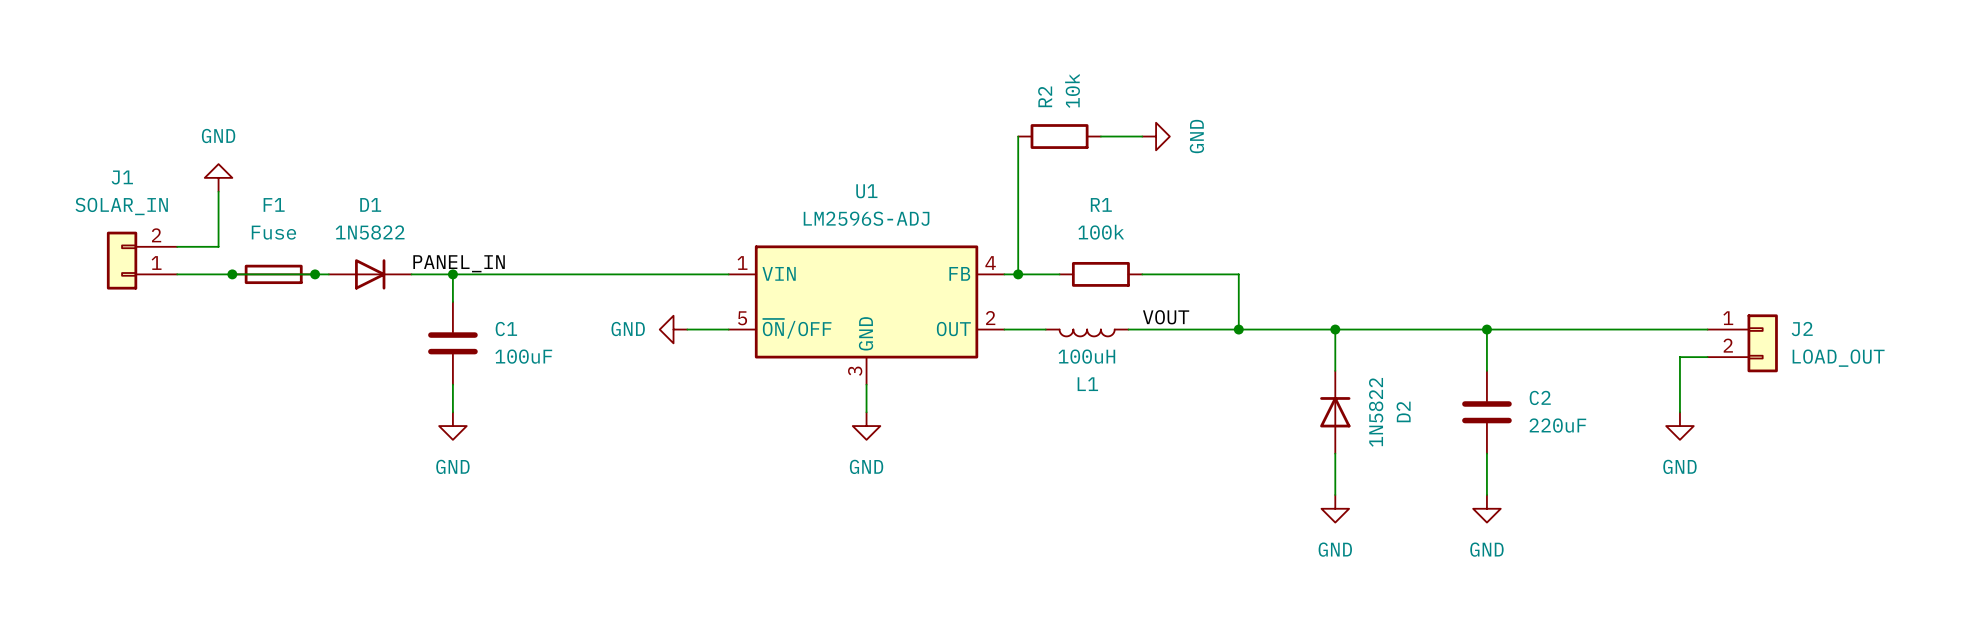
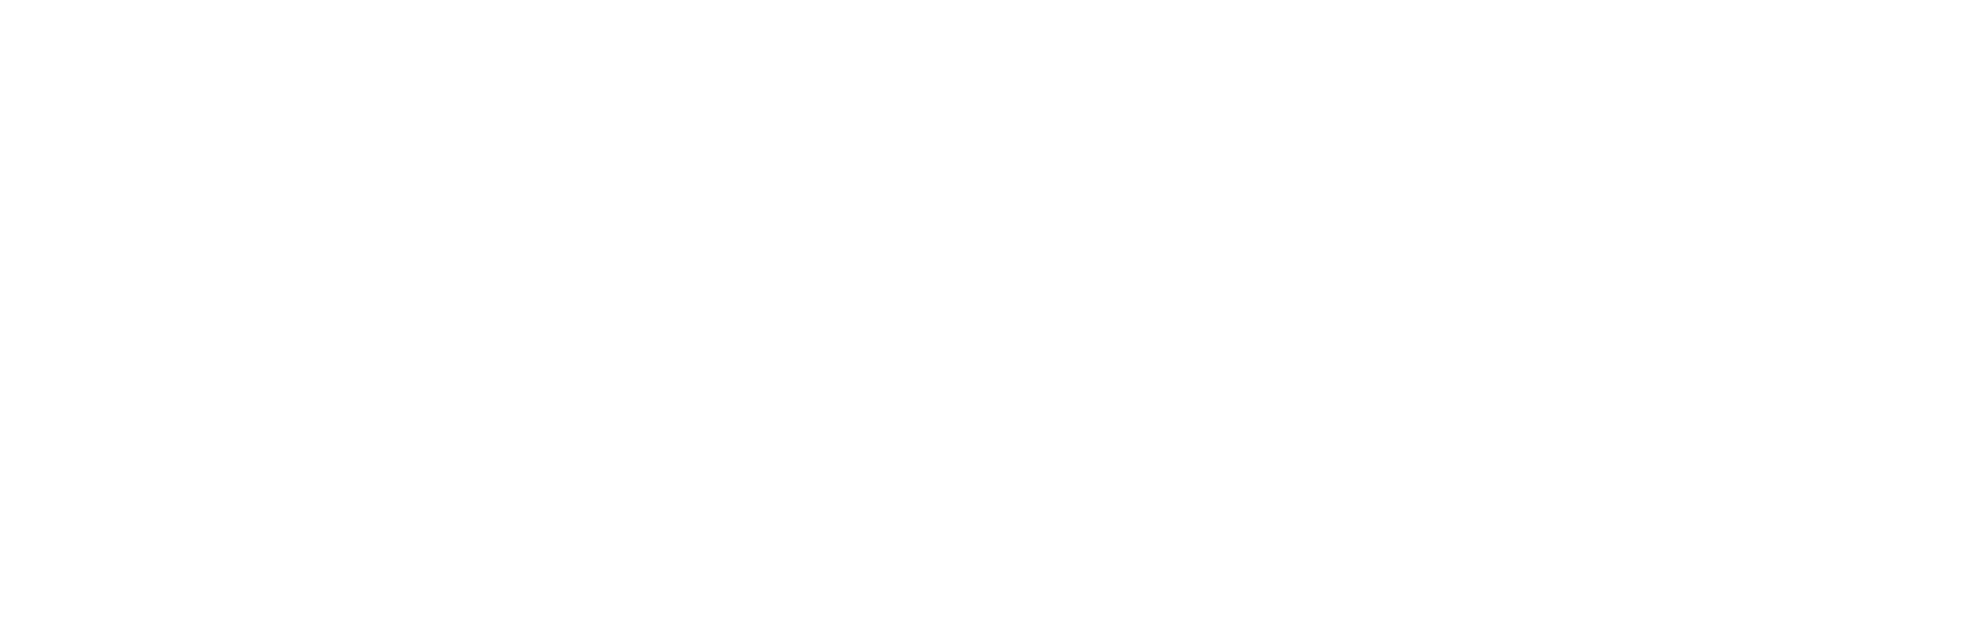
wire: (1018, 136) (1018, 274) -> none
R2: 10k (1059, 136) -> none
wire: (1100, 136) (1142, 136) -> none
power symbol: GND (1156, 136) -> none
power symbol: GND (218, 177) -> none
wire: (218, 191) (218, 246) (177, 246) -> none
J1: SOLAR_IN (142, 260) -> none
label: PANEL_IN (459, 263) -> none
wire: (177, 274) (328, 274) -> none
junction: (232, 274) -> none
F1: Fuse (273, 274) -> none
junction: (315, 274) -> none
D1: 1N5822 (370, 274) -> none
wire: (411, 274) (728, 274) -> none
wire: (452, 274) (452, 301) -> none
junction: (452, 274) -> none
wire: (1004, 274) (1059, 274) -> none
junction: (1018, 274) -> none
R1: 100k (1100, 274) -> none
wire: (1142, 274) (1238, 274) (1238, 329) -> none
U1: LM2596S-ADJ (866, 315) -> none
label: VOUT (1166, 317) -> none
power symbol: GND (673, 329) -> none
wire: (687, 329) (728, 329) -> none
wire: (1004, 329) (1045, 329) -> none
wire: (1128, 329) (1707, 329) -> none
junction: (1238, 329) -> none
wire: (1335, 329) (1335, 370) -> none
junction: (1335, 329) -> none
wire: (1486, 329) (1486, 370) -> none
junction: (1486, 329) -> none
L1: 100uH (1087, 332) -> none
C1: 100uF (452, 343) -> none
J2: LOAD_OUT (1742, 343) -> none
wire: (1707, 357) (1679, 357) (1679, 412) -> none
wire: (452, 384) (452, 412) -> none
wire: (866, 384) (866, 412) -> none
D2: 1N5822 (1335, 412) -> none
C2: 220uF (1486, 412) -> none
power symbol: GND (452, 426) -> none
power symbol: GND (866, 426) -> none
power symbol: GND (1679, 426) -> none
wire: (1335, 453) (1335, 494) -> none
wire: (1486, 453) (1486, 494) -> none
power symbol: GND (1335, 508) -> none
power symbol: GND (1486, 508) -> none

